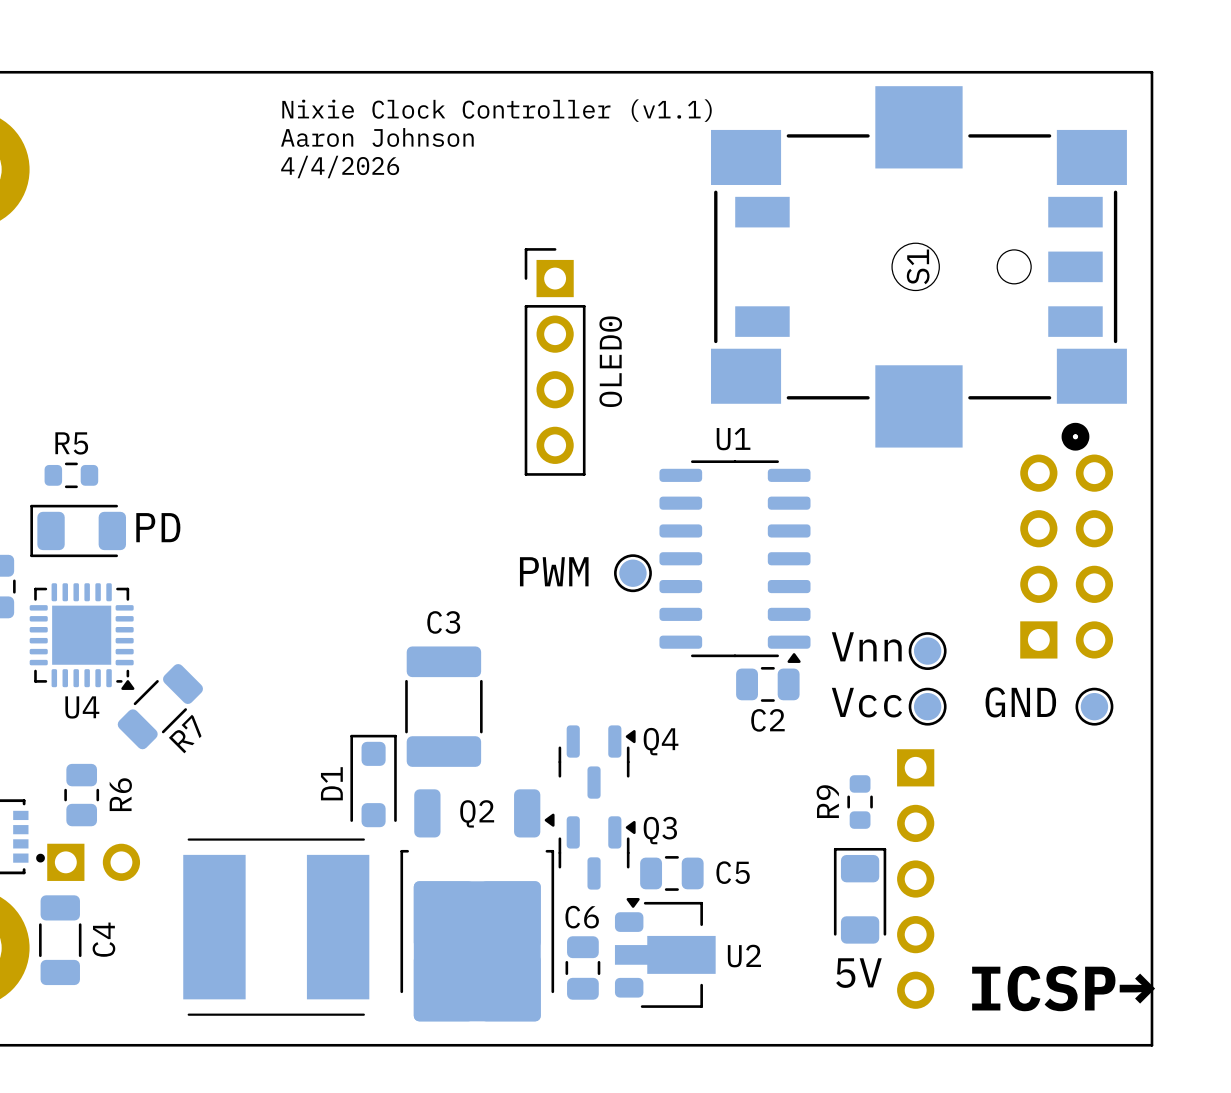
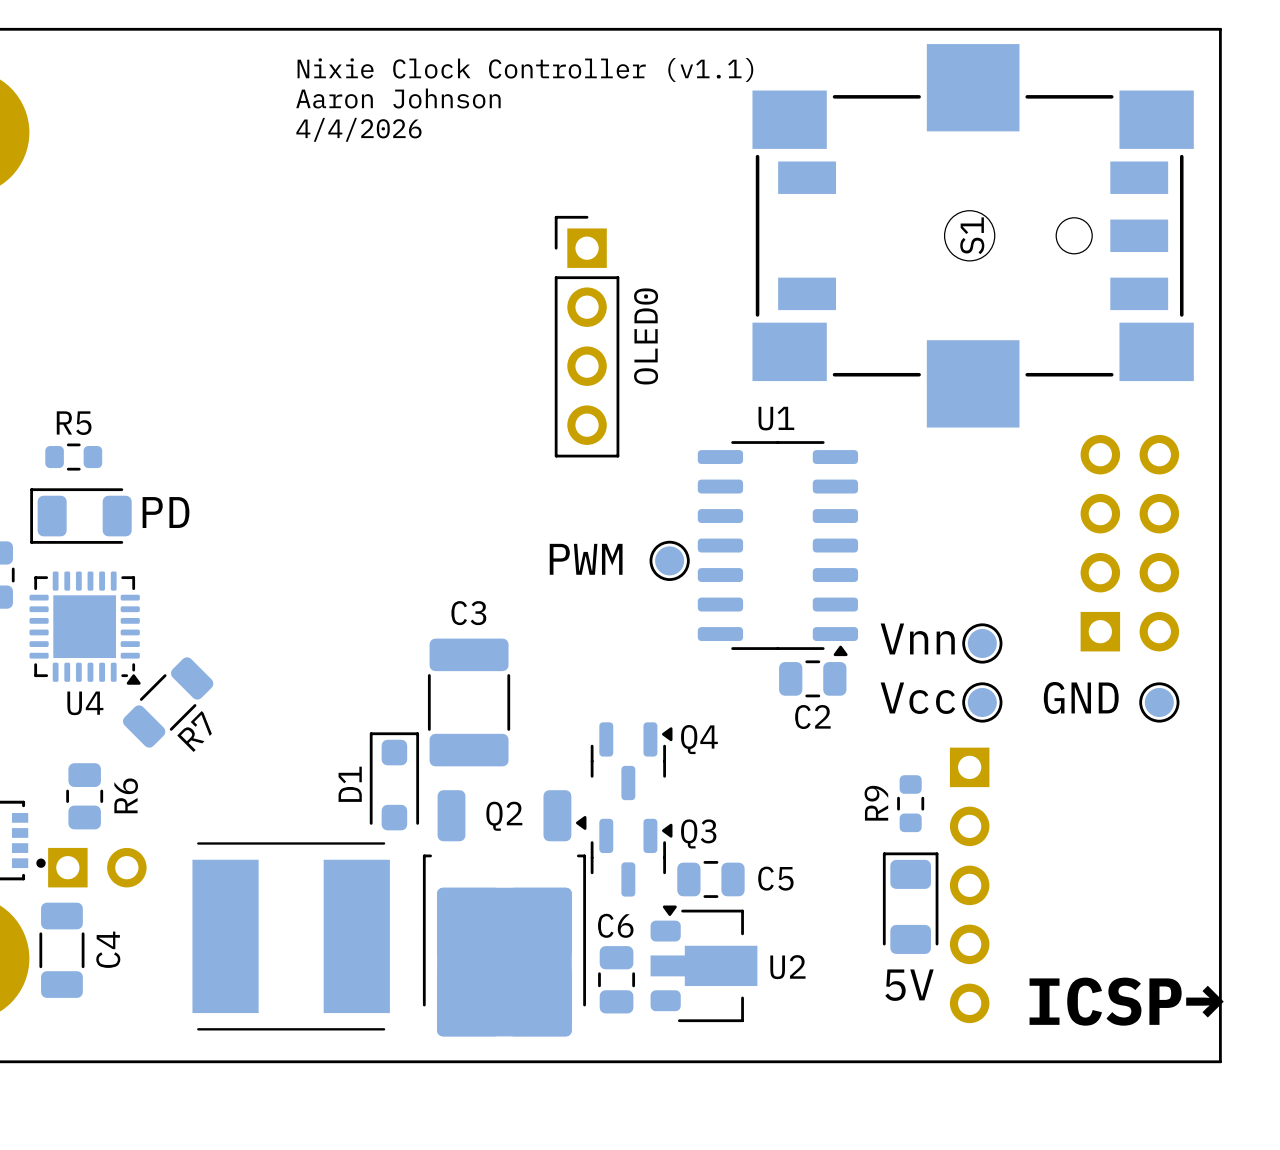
S1 footprint: [711, 86, 1127, 451] -> [752, 44, 1194, 428]

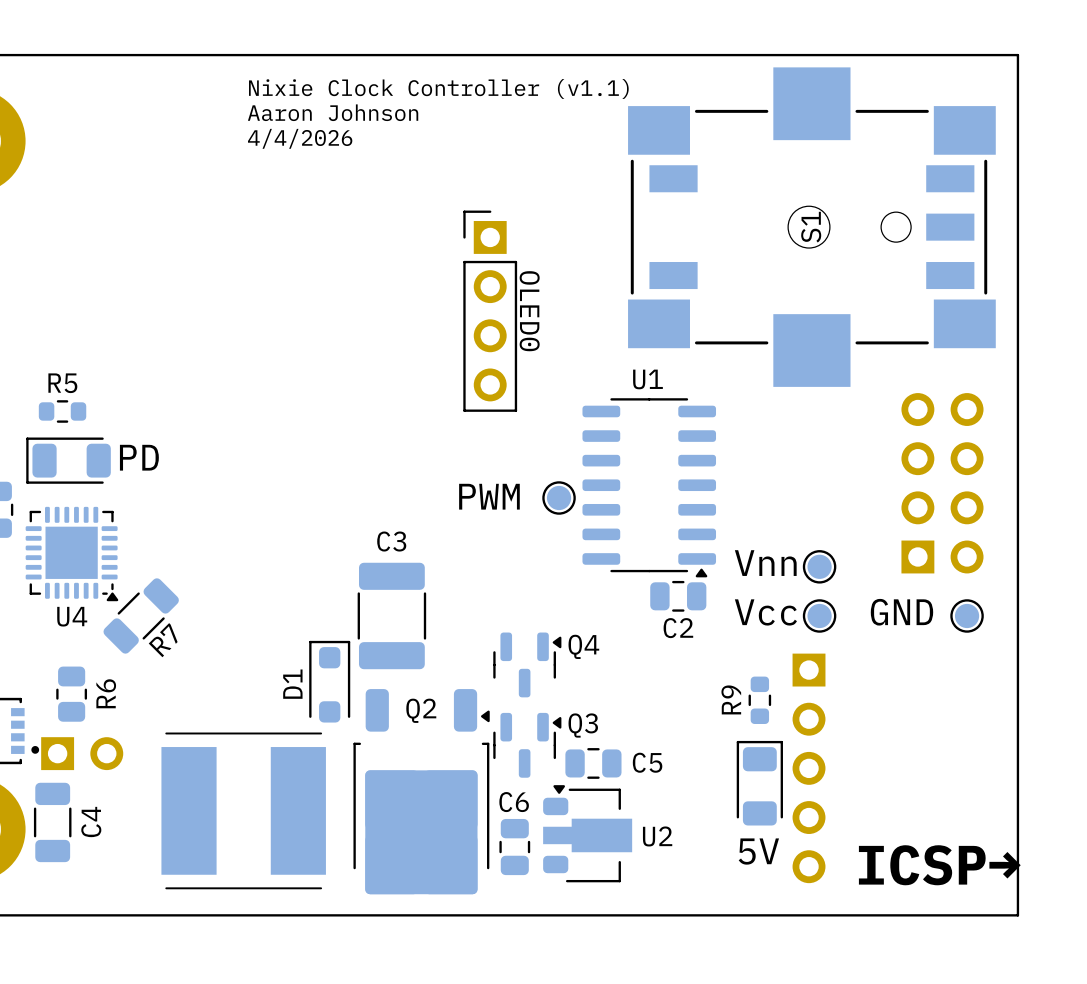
OLED0 name rotation: 0° (646, 336) -> 180° (529, 311)

